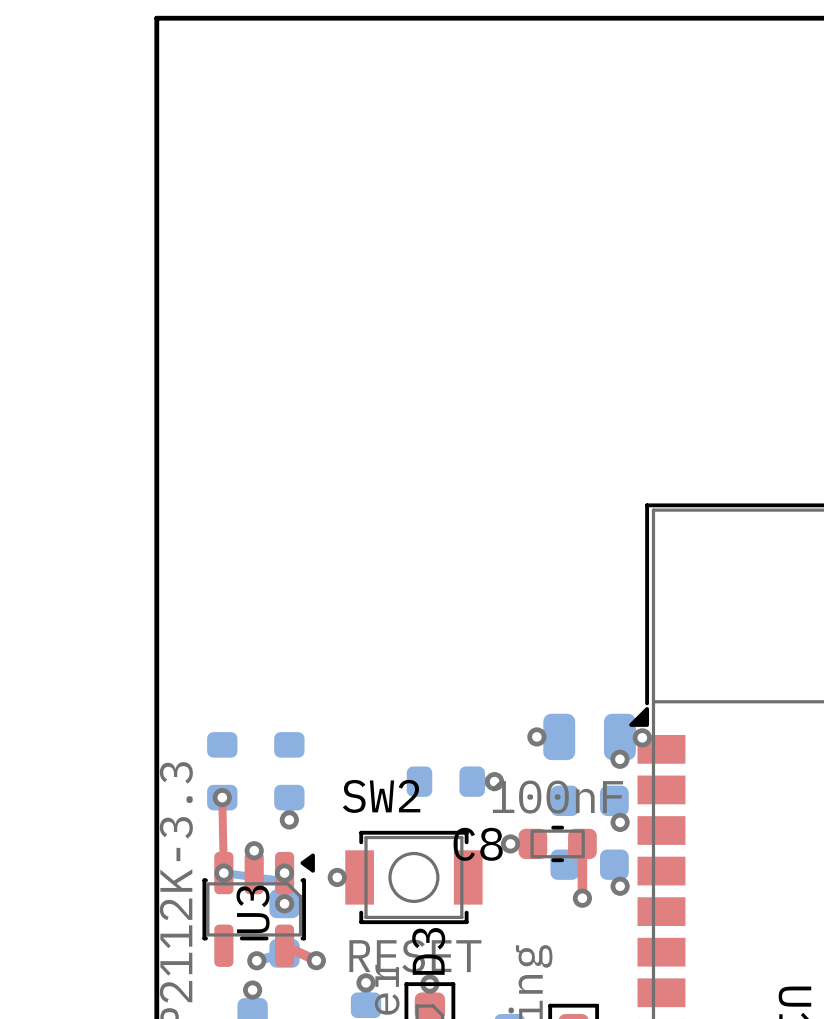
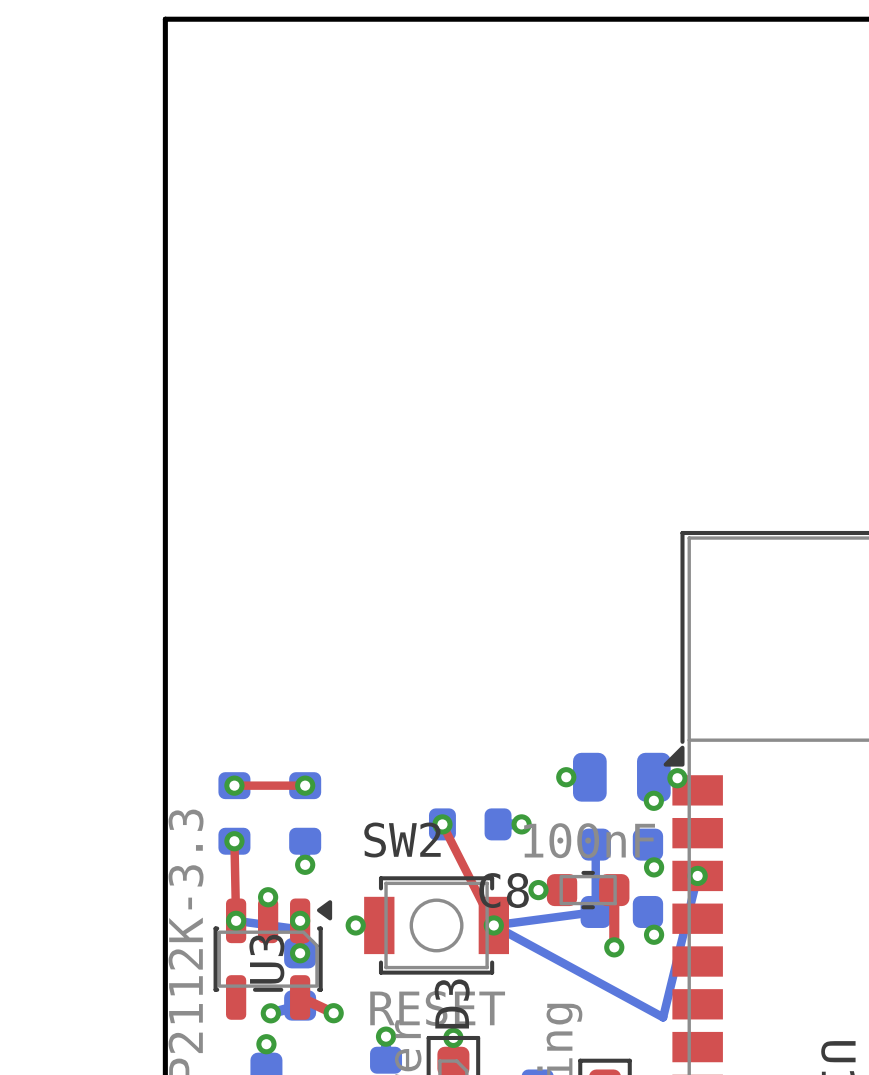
top track: none -> (234, 785) (305, 785)
via: none -> (234, 785)
via: none -> (305, 785)
top track: none -> (442, 824) (493, 925)
via: none -> (442, 824)
bottom track: none -> (595, 844) (595, 911) (493, 925) (663, 1017) (697, 875)
via: none -> (697, 875)
via: none -> (493, 925)

